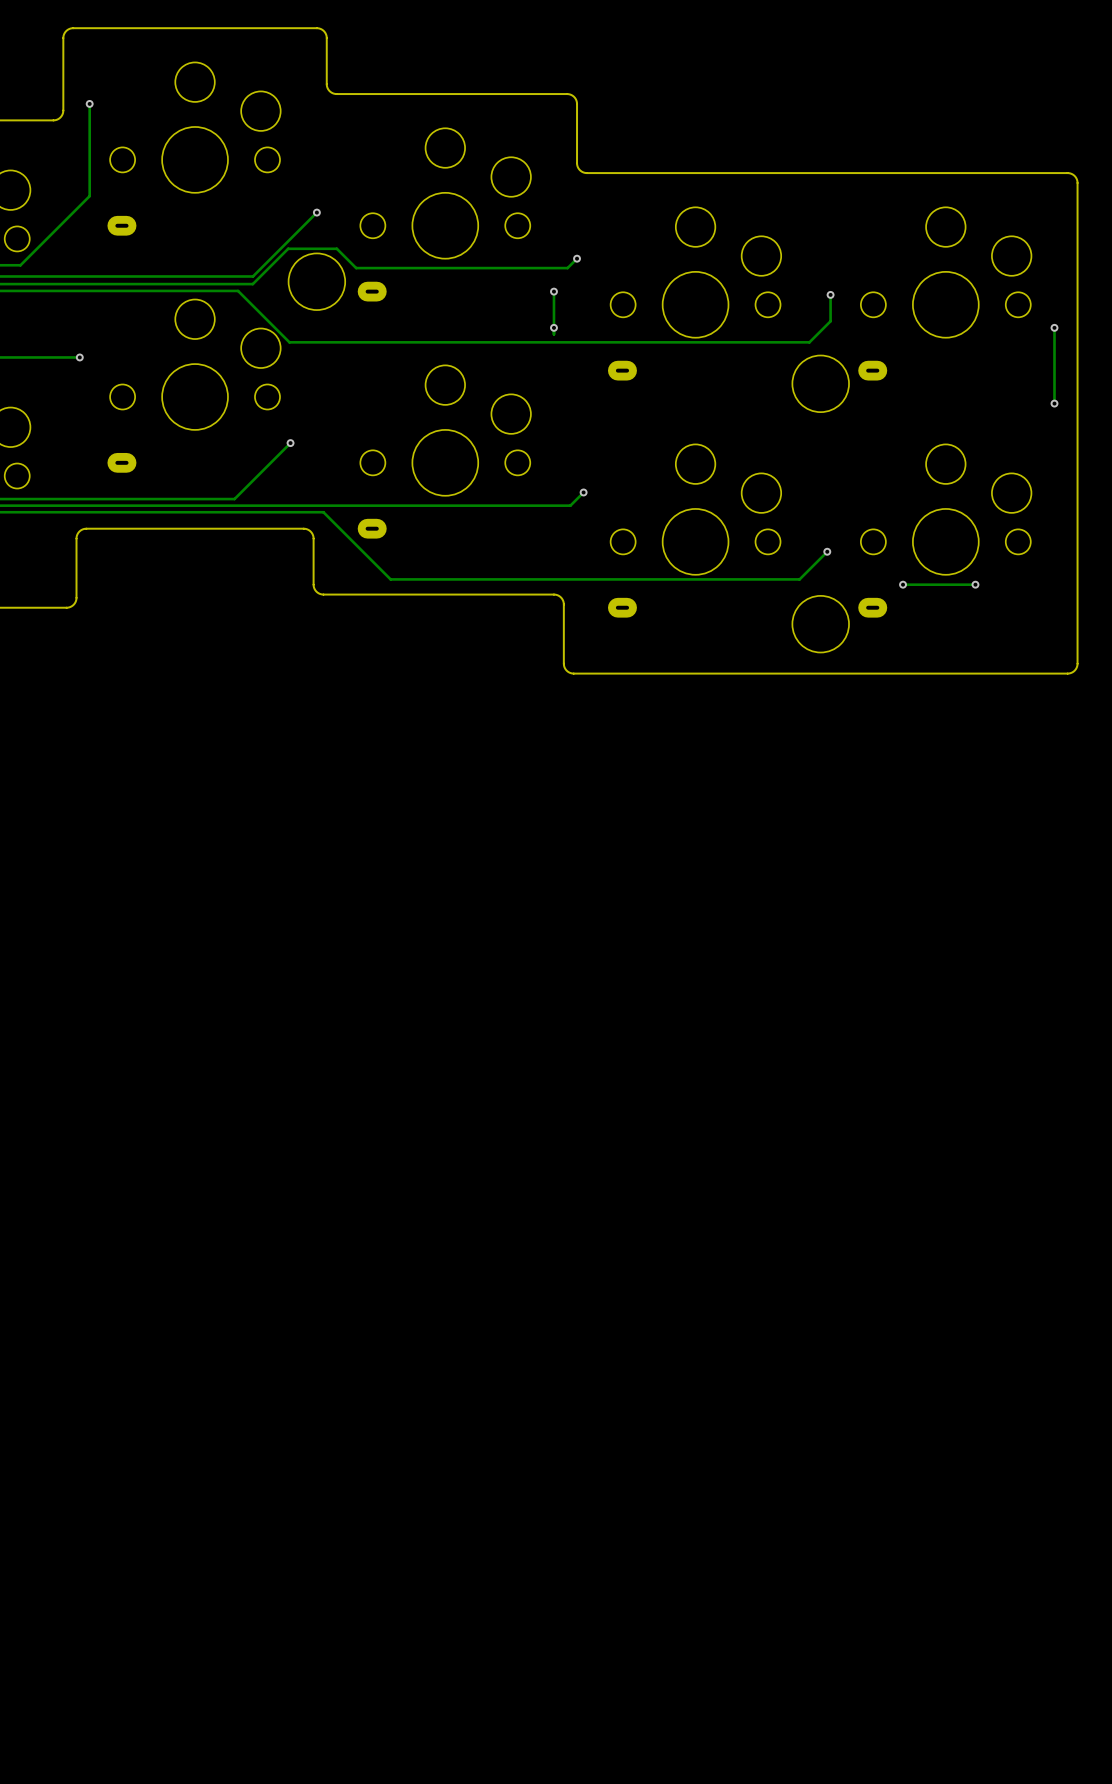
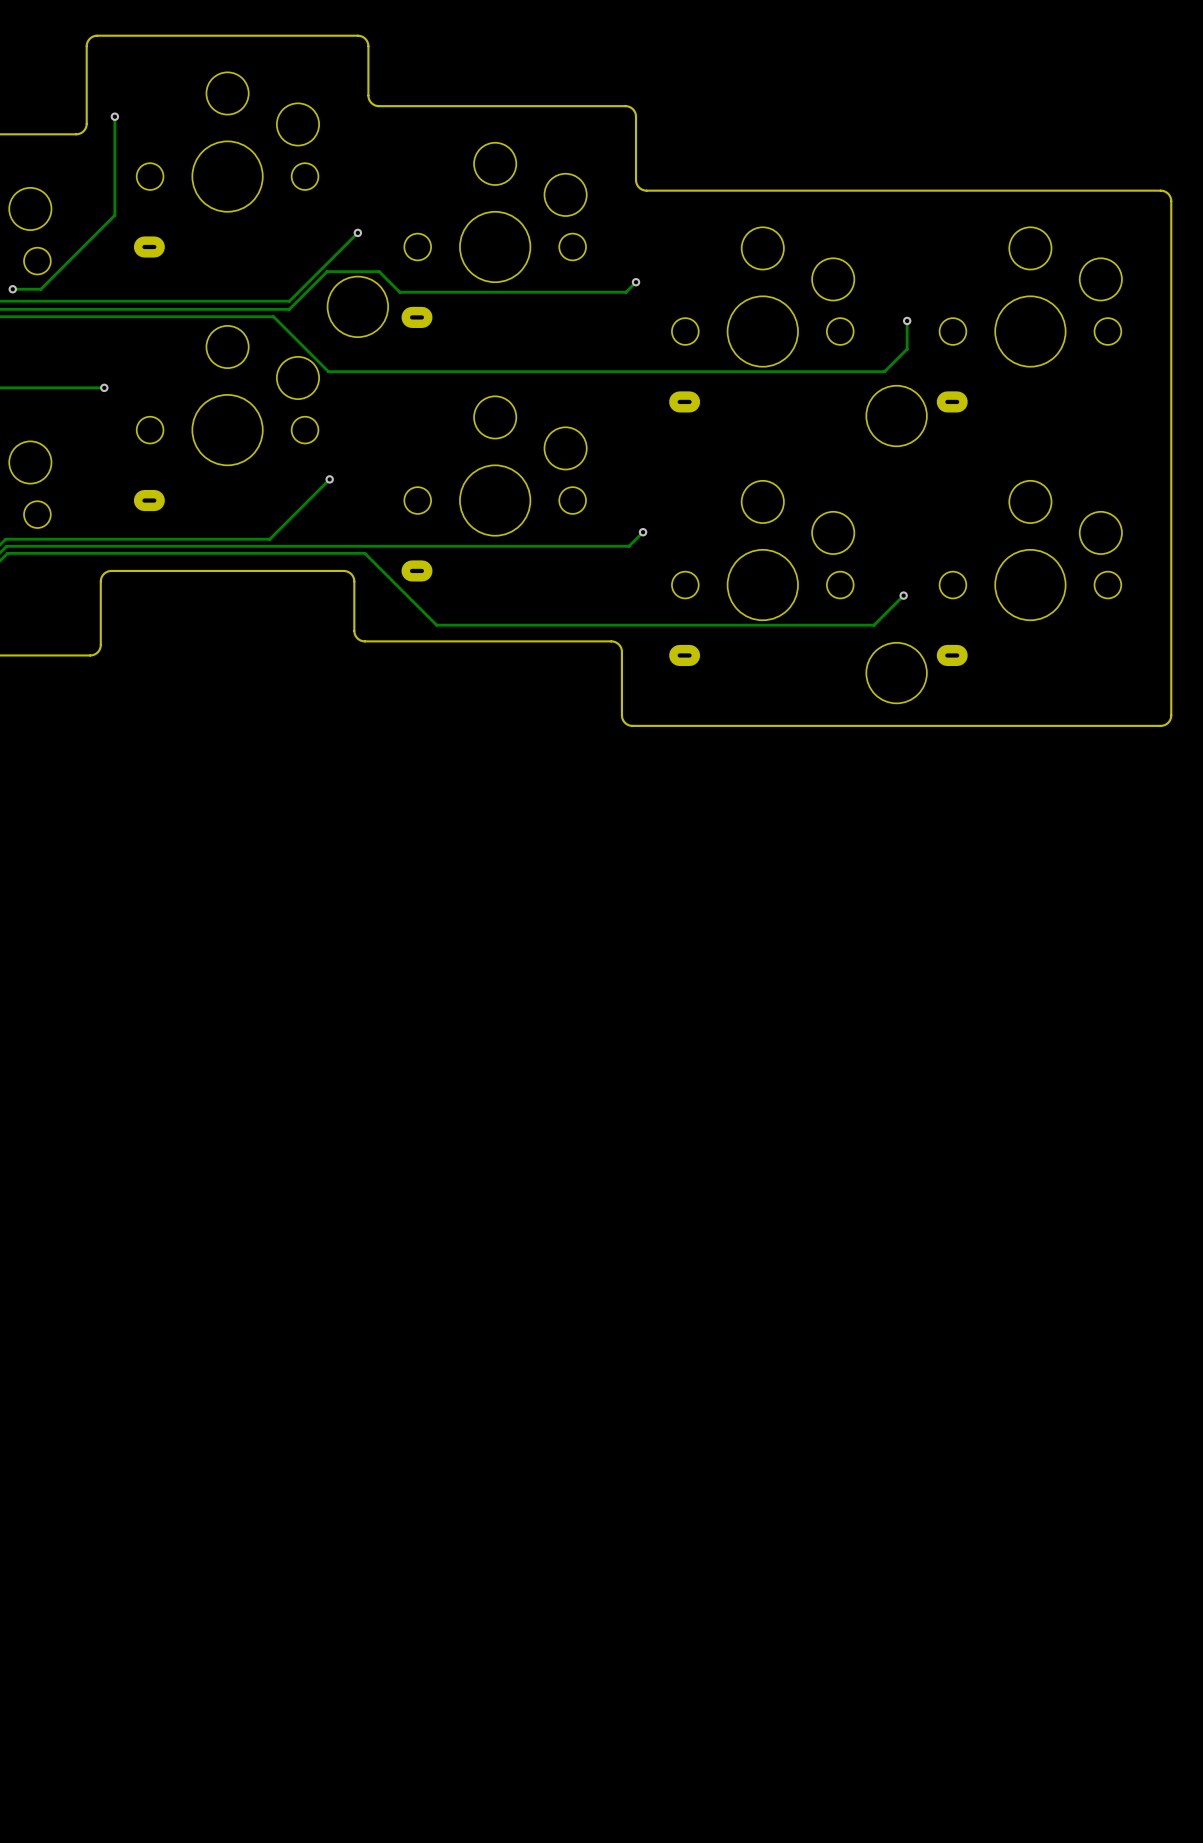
track: (553, 291) (553, 334) -> none
via: (553, 291) -> none
via: (553, 327) -> none
track: (1054, 327) (1054, 403) -> none
via: (1054, 327) -> none
via: (1054, 403) -> none
via: (903, 584) -> none
track: (975, 584) (903, 584) -> none
via: (975, 584) -> none

